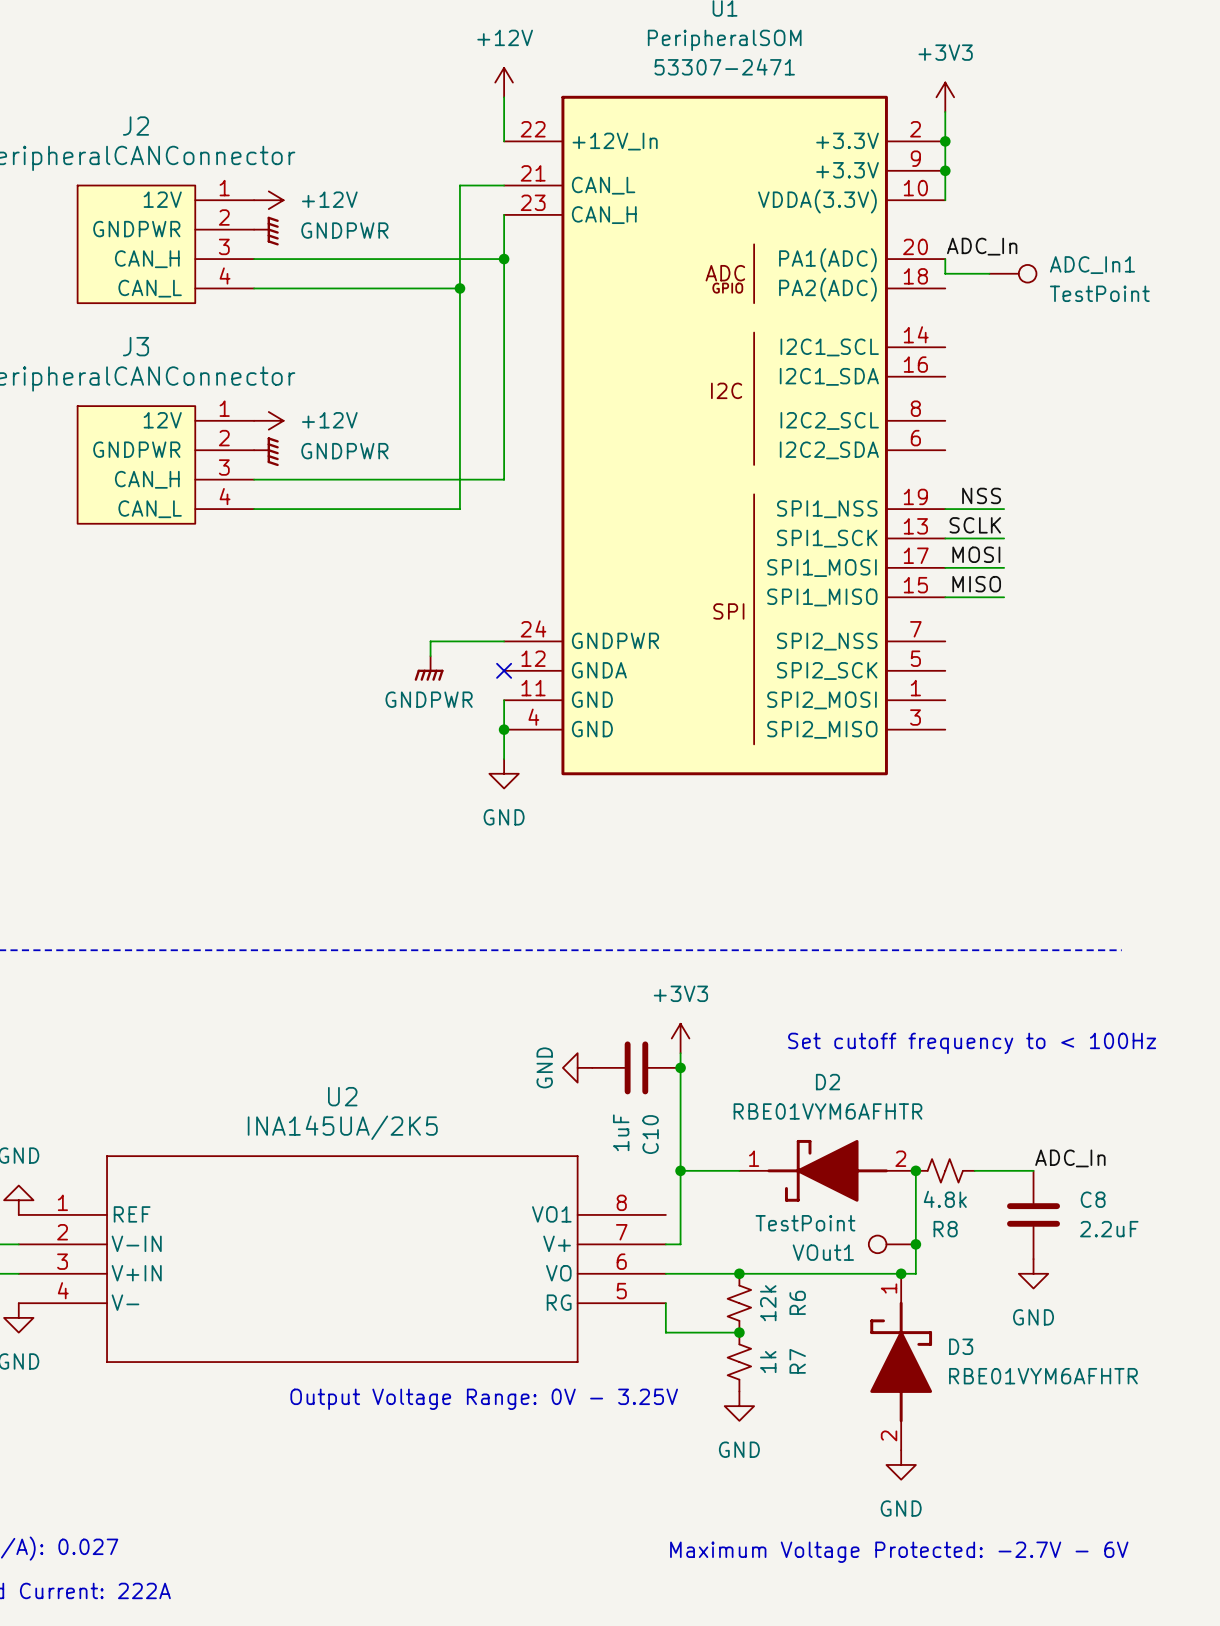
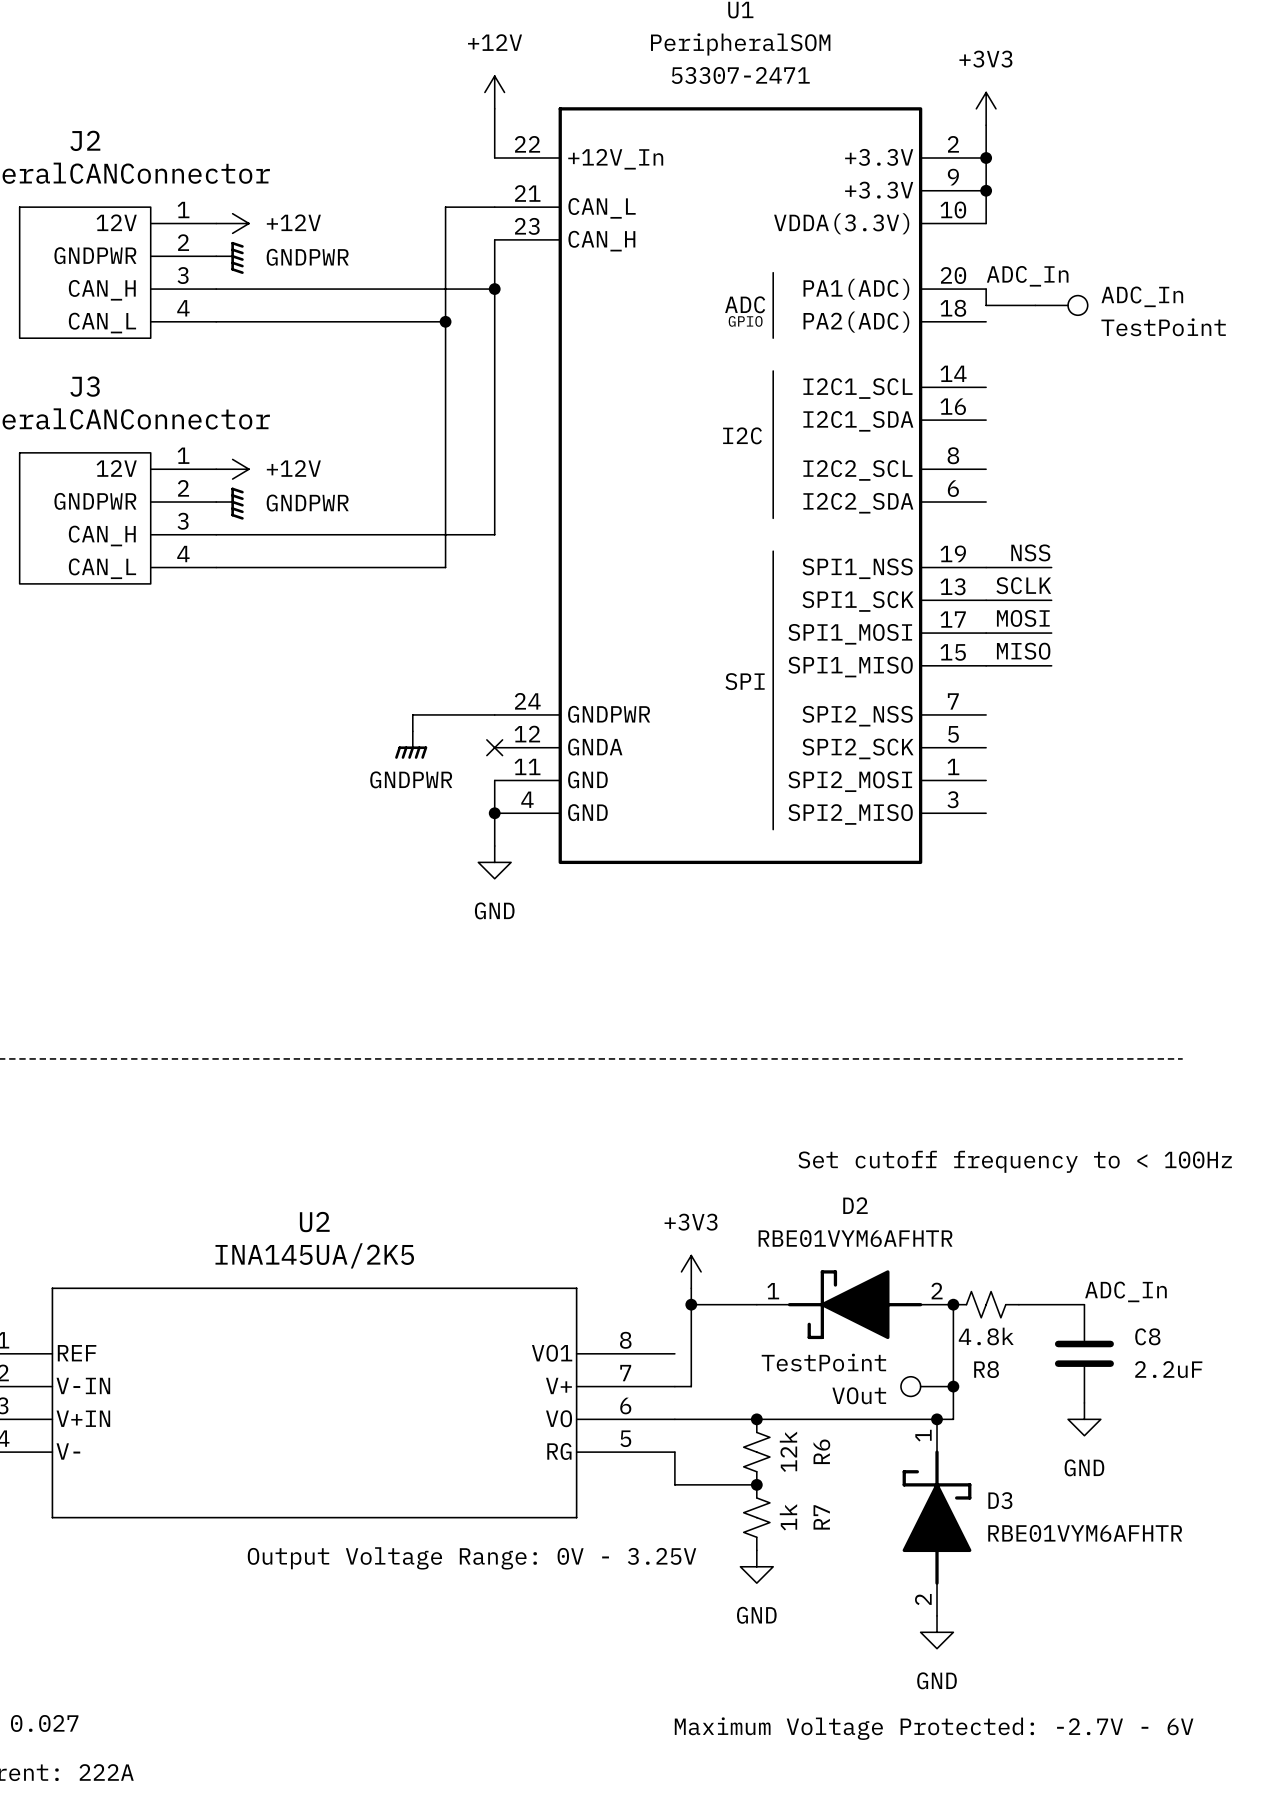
ADC_In1 name: ADC_In1 (1092, 265) -> ADC_In (1142, 296)
power symbol position: +3V3 (680, 1038) -> +3V3 (691, 1271)
wire: (680, 1053) (680, 1156) -> none
power symbol: GND (577, 1067) -> none
C10: 1uF (636, 1067) -> none
junction: (680, 1067) -> none
VOut1 name: VOut1 (823, 1252) -> VOut (859, 1395)

